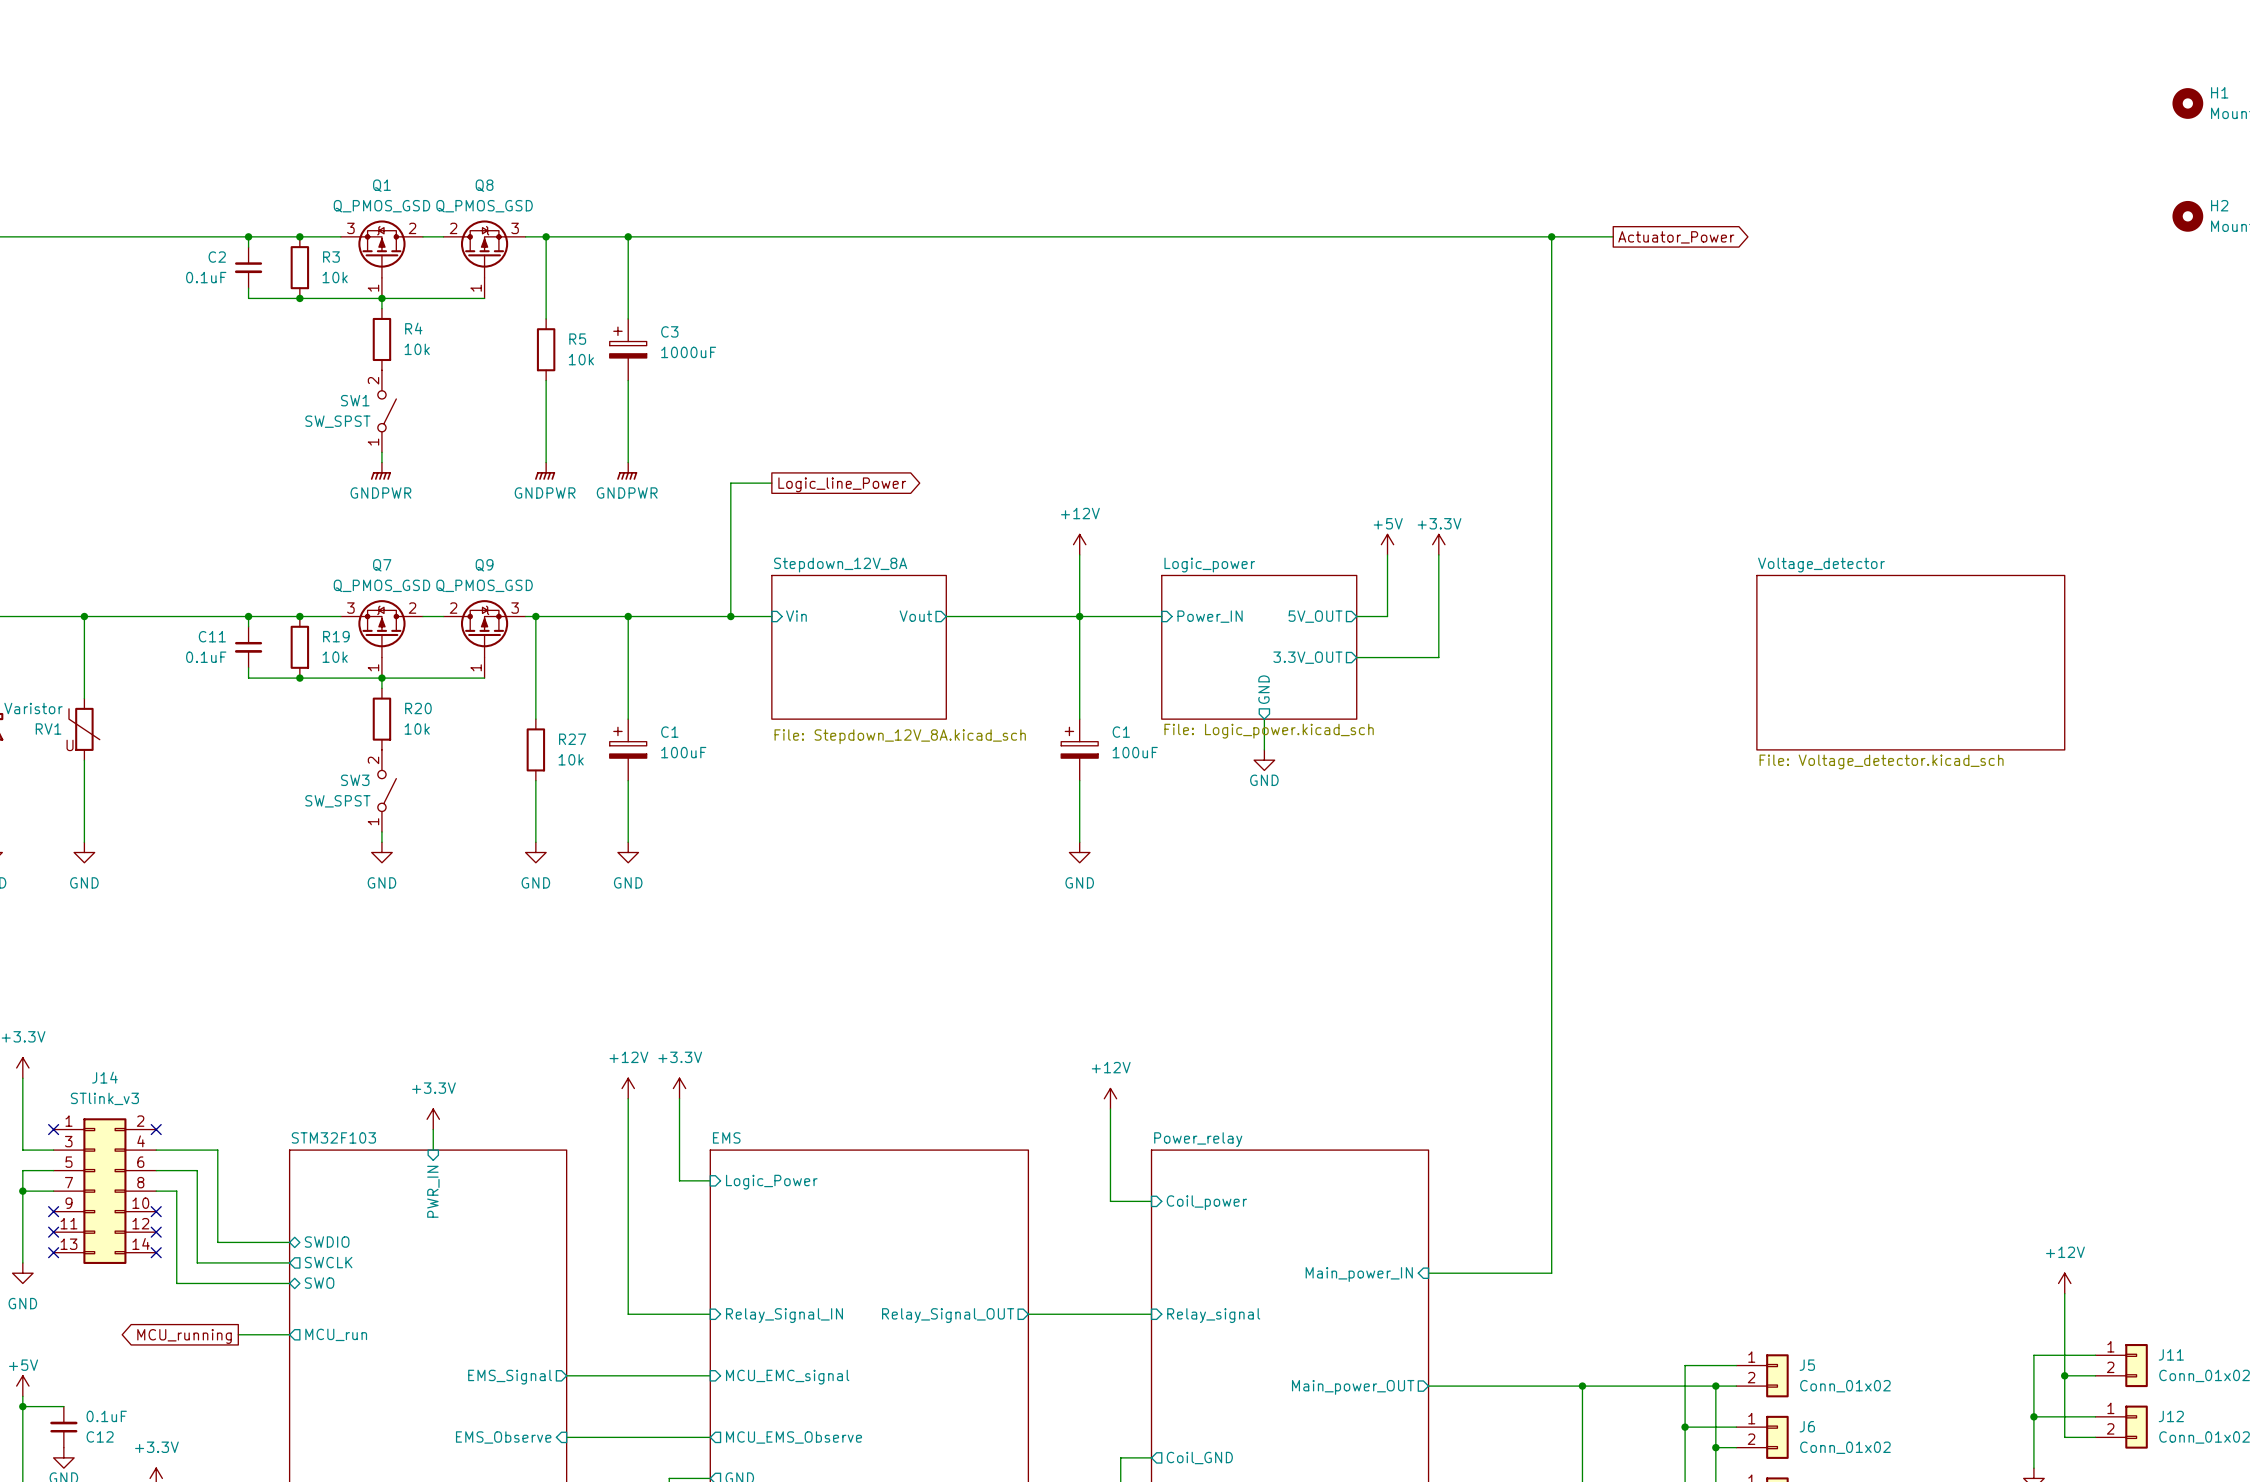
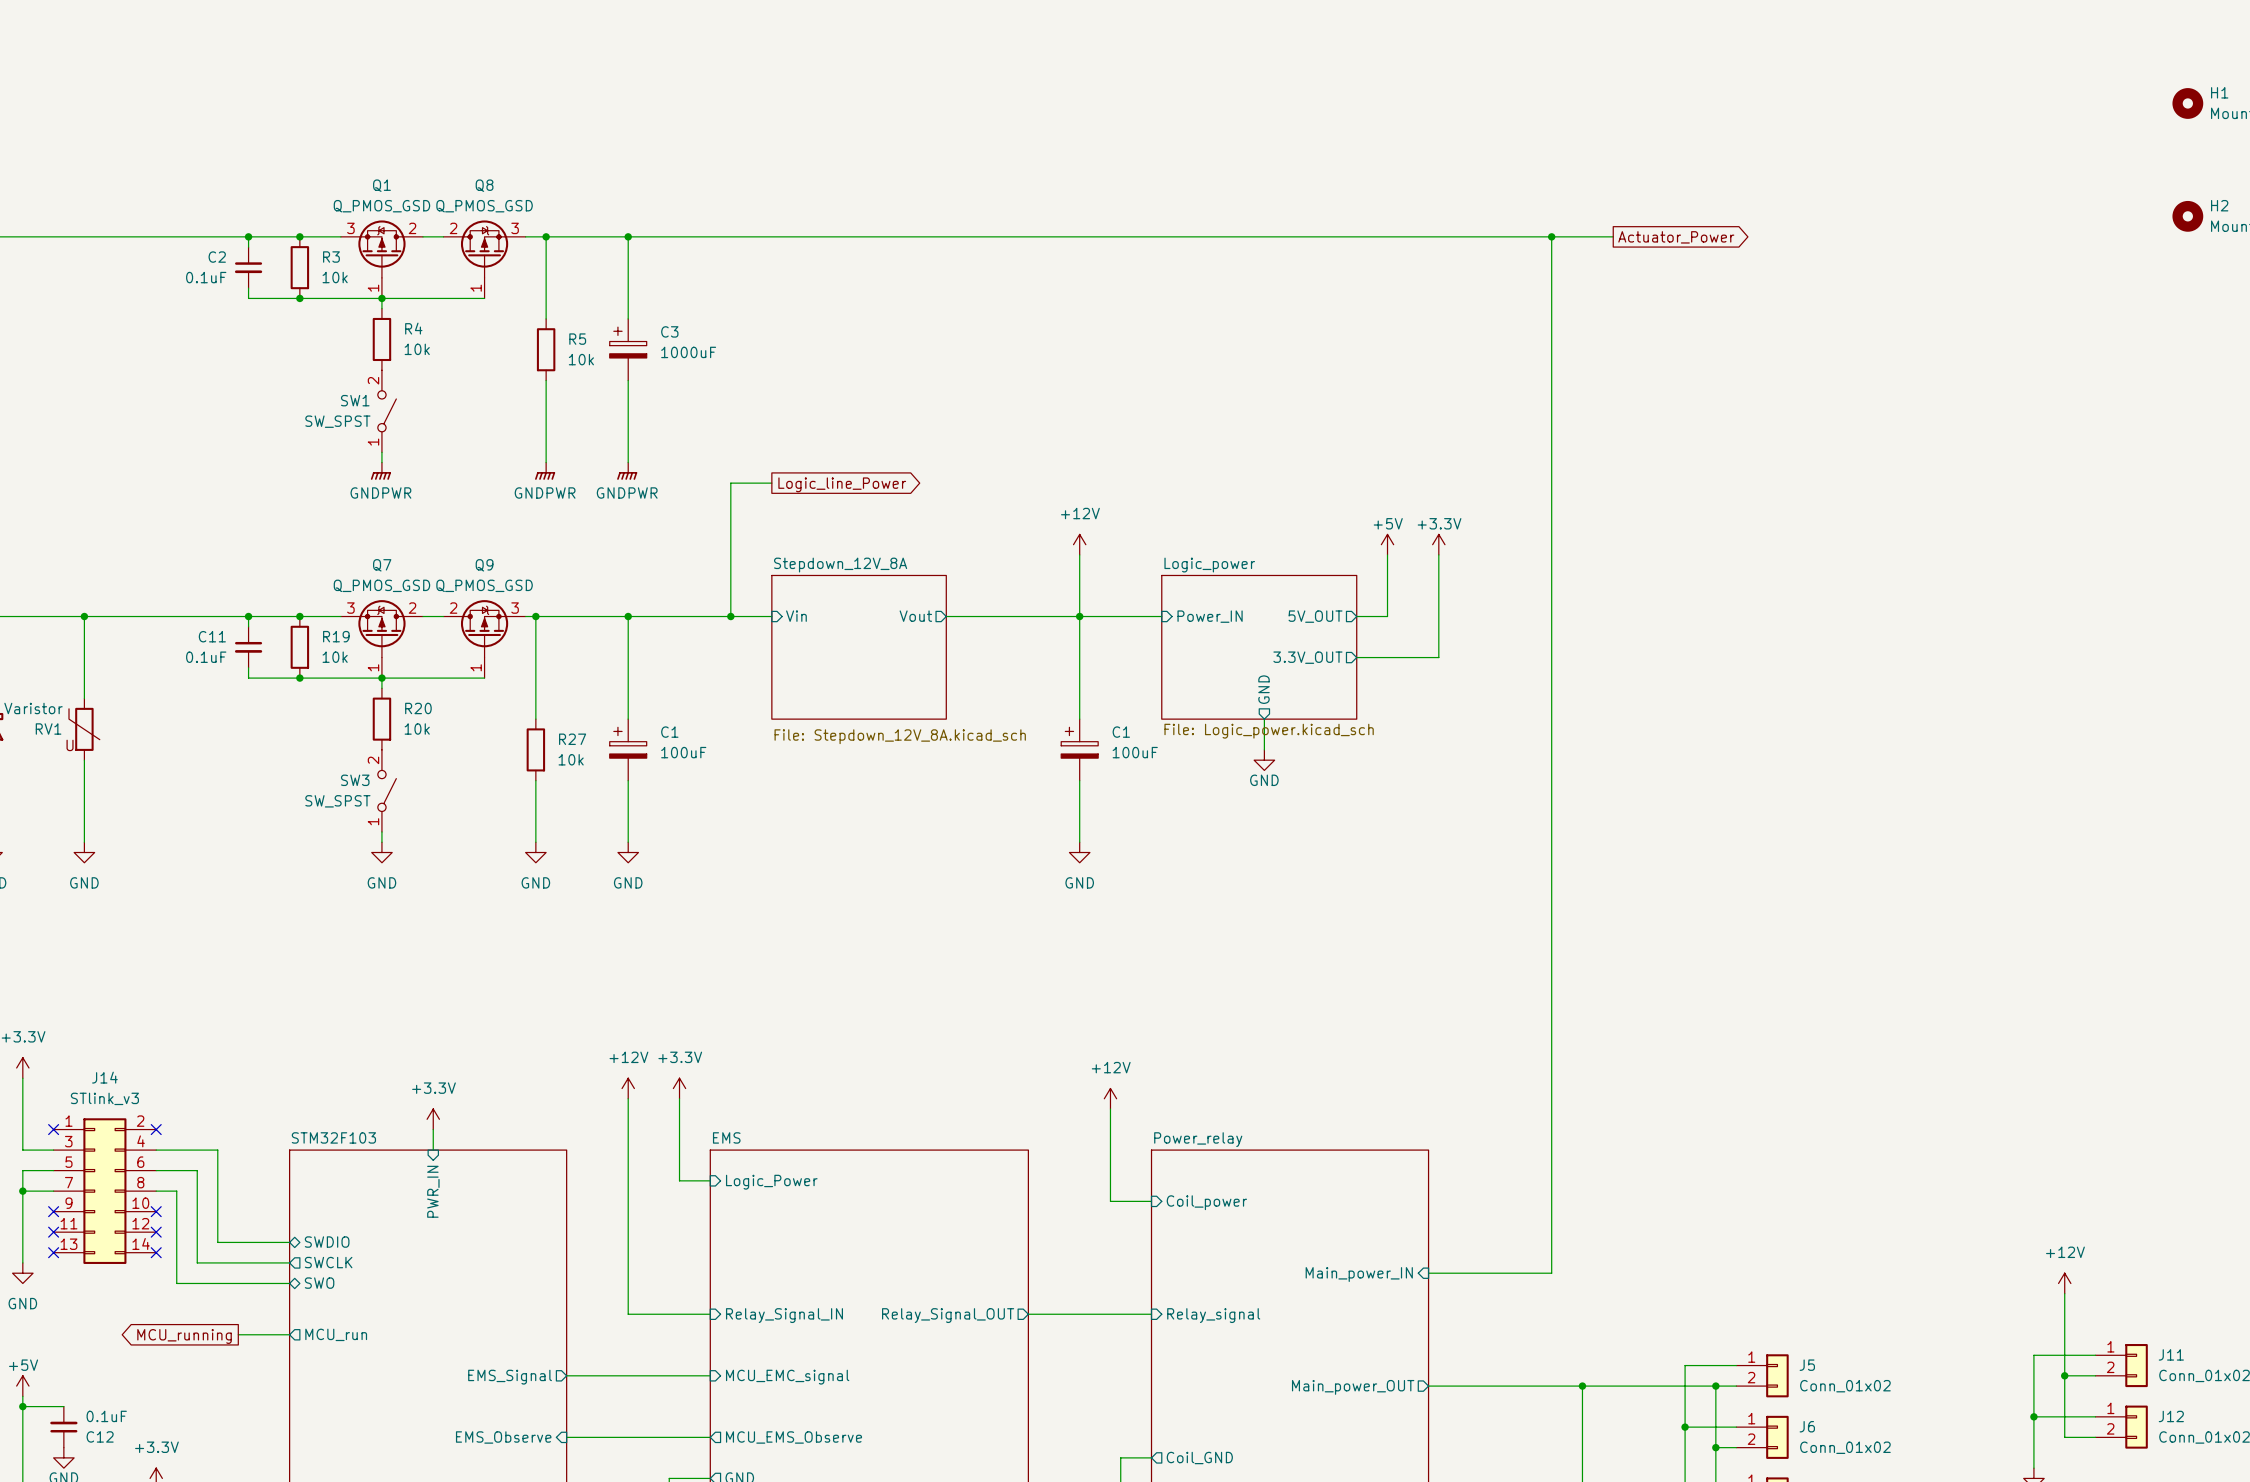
sheet Voltage_detector: File: Voltage_detector.kicad_sch (1910, 662) -> none

